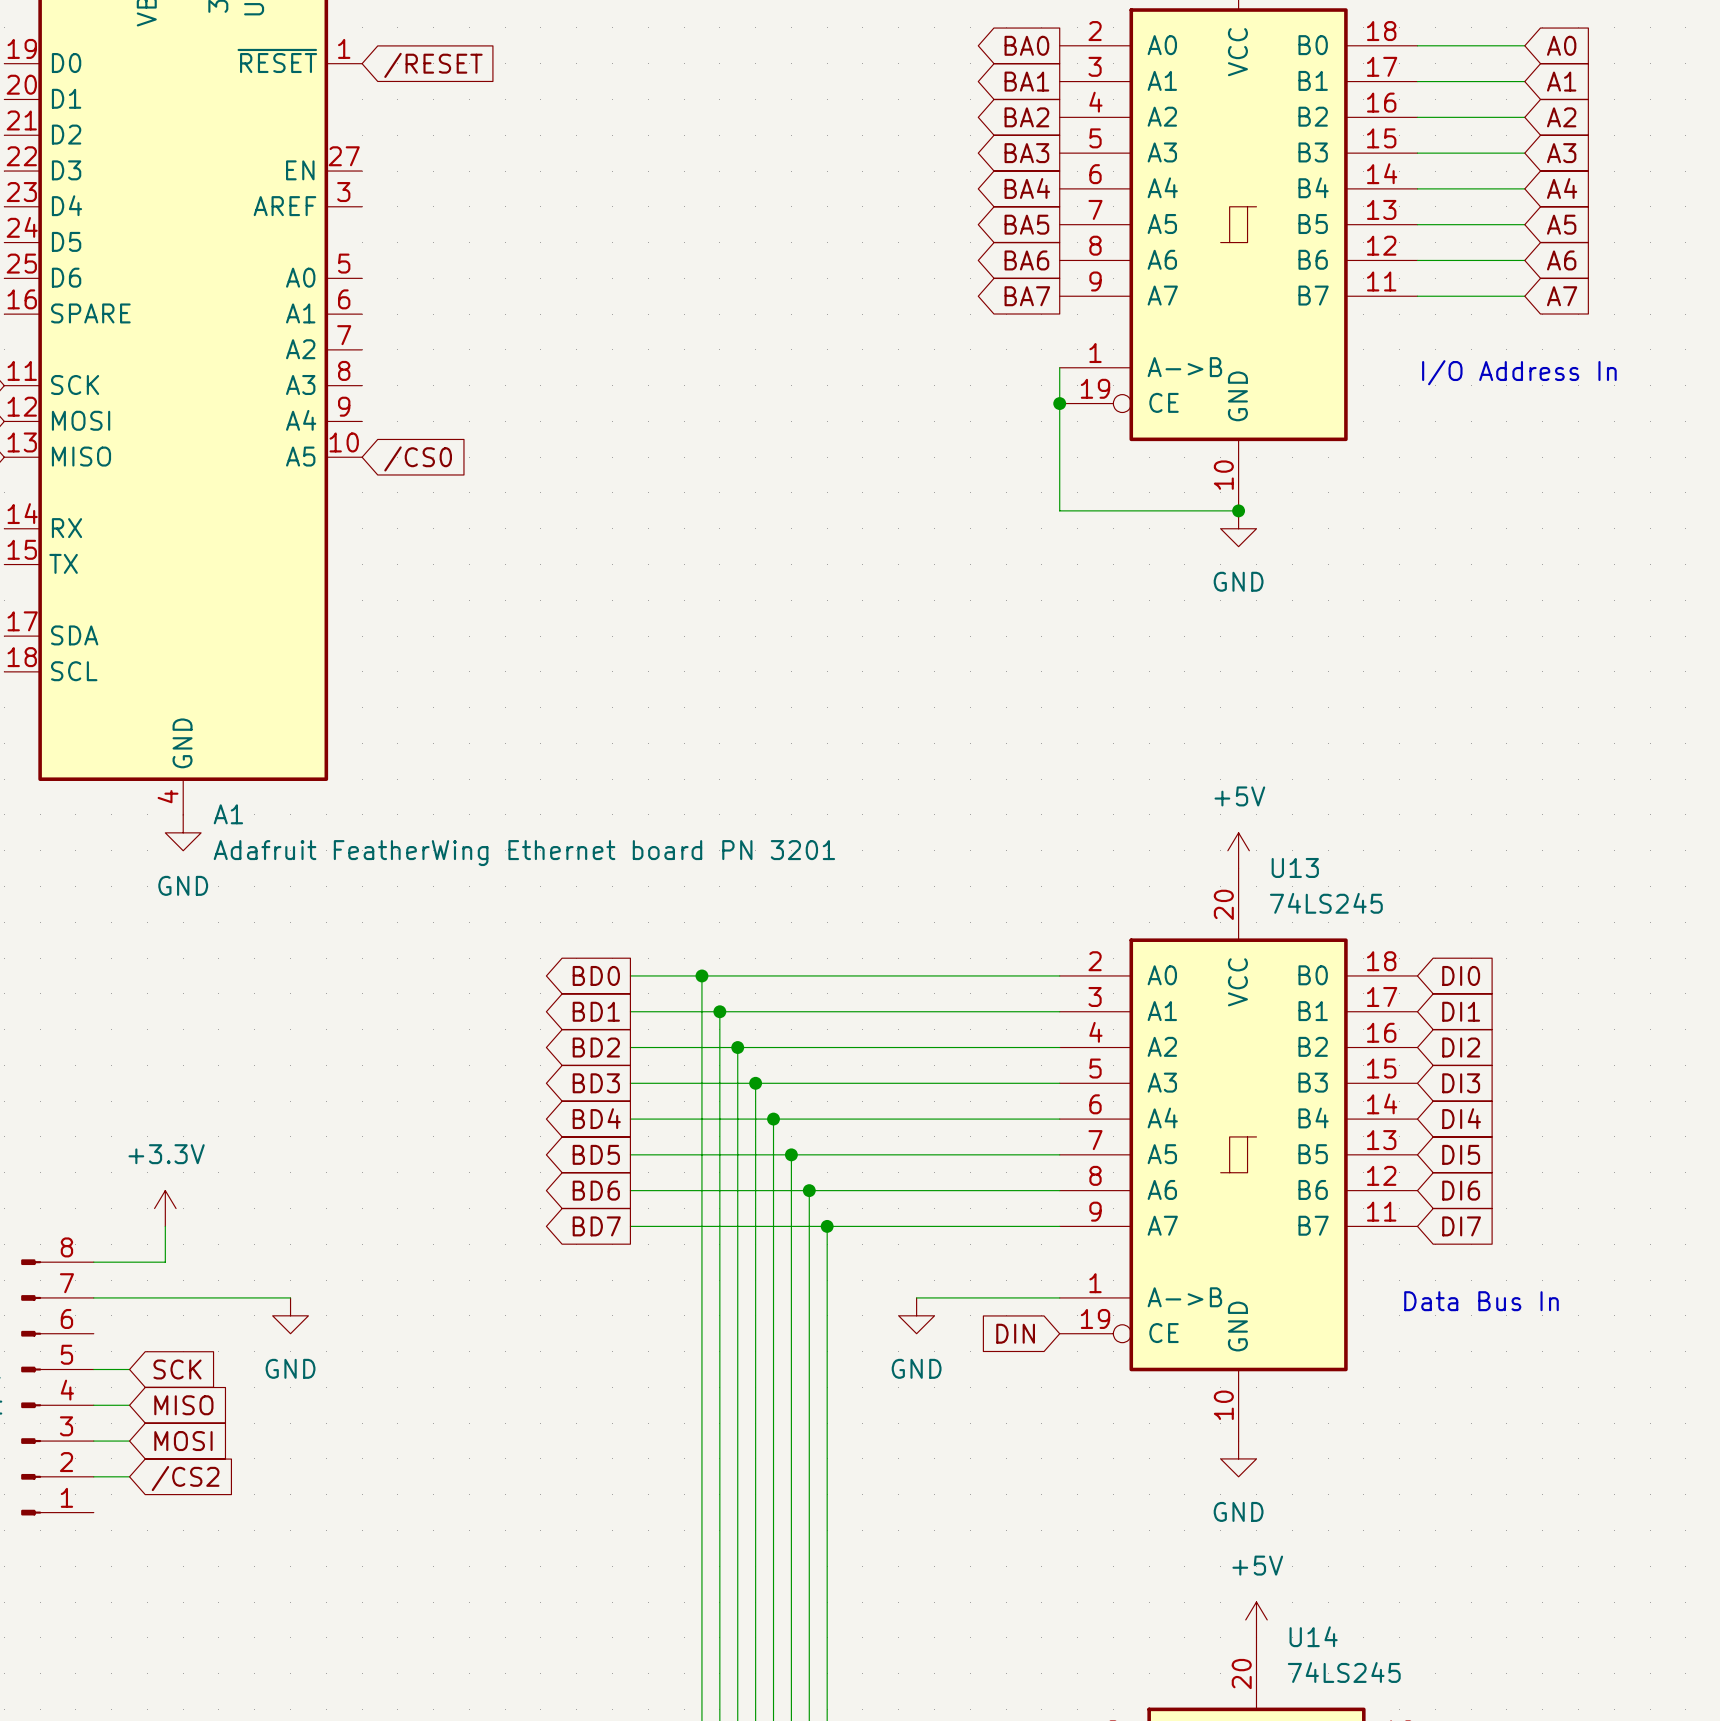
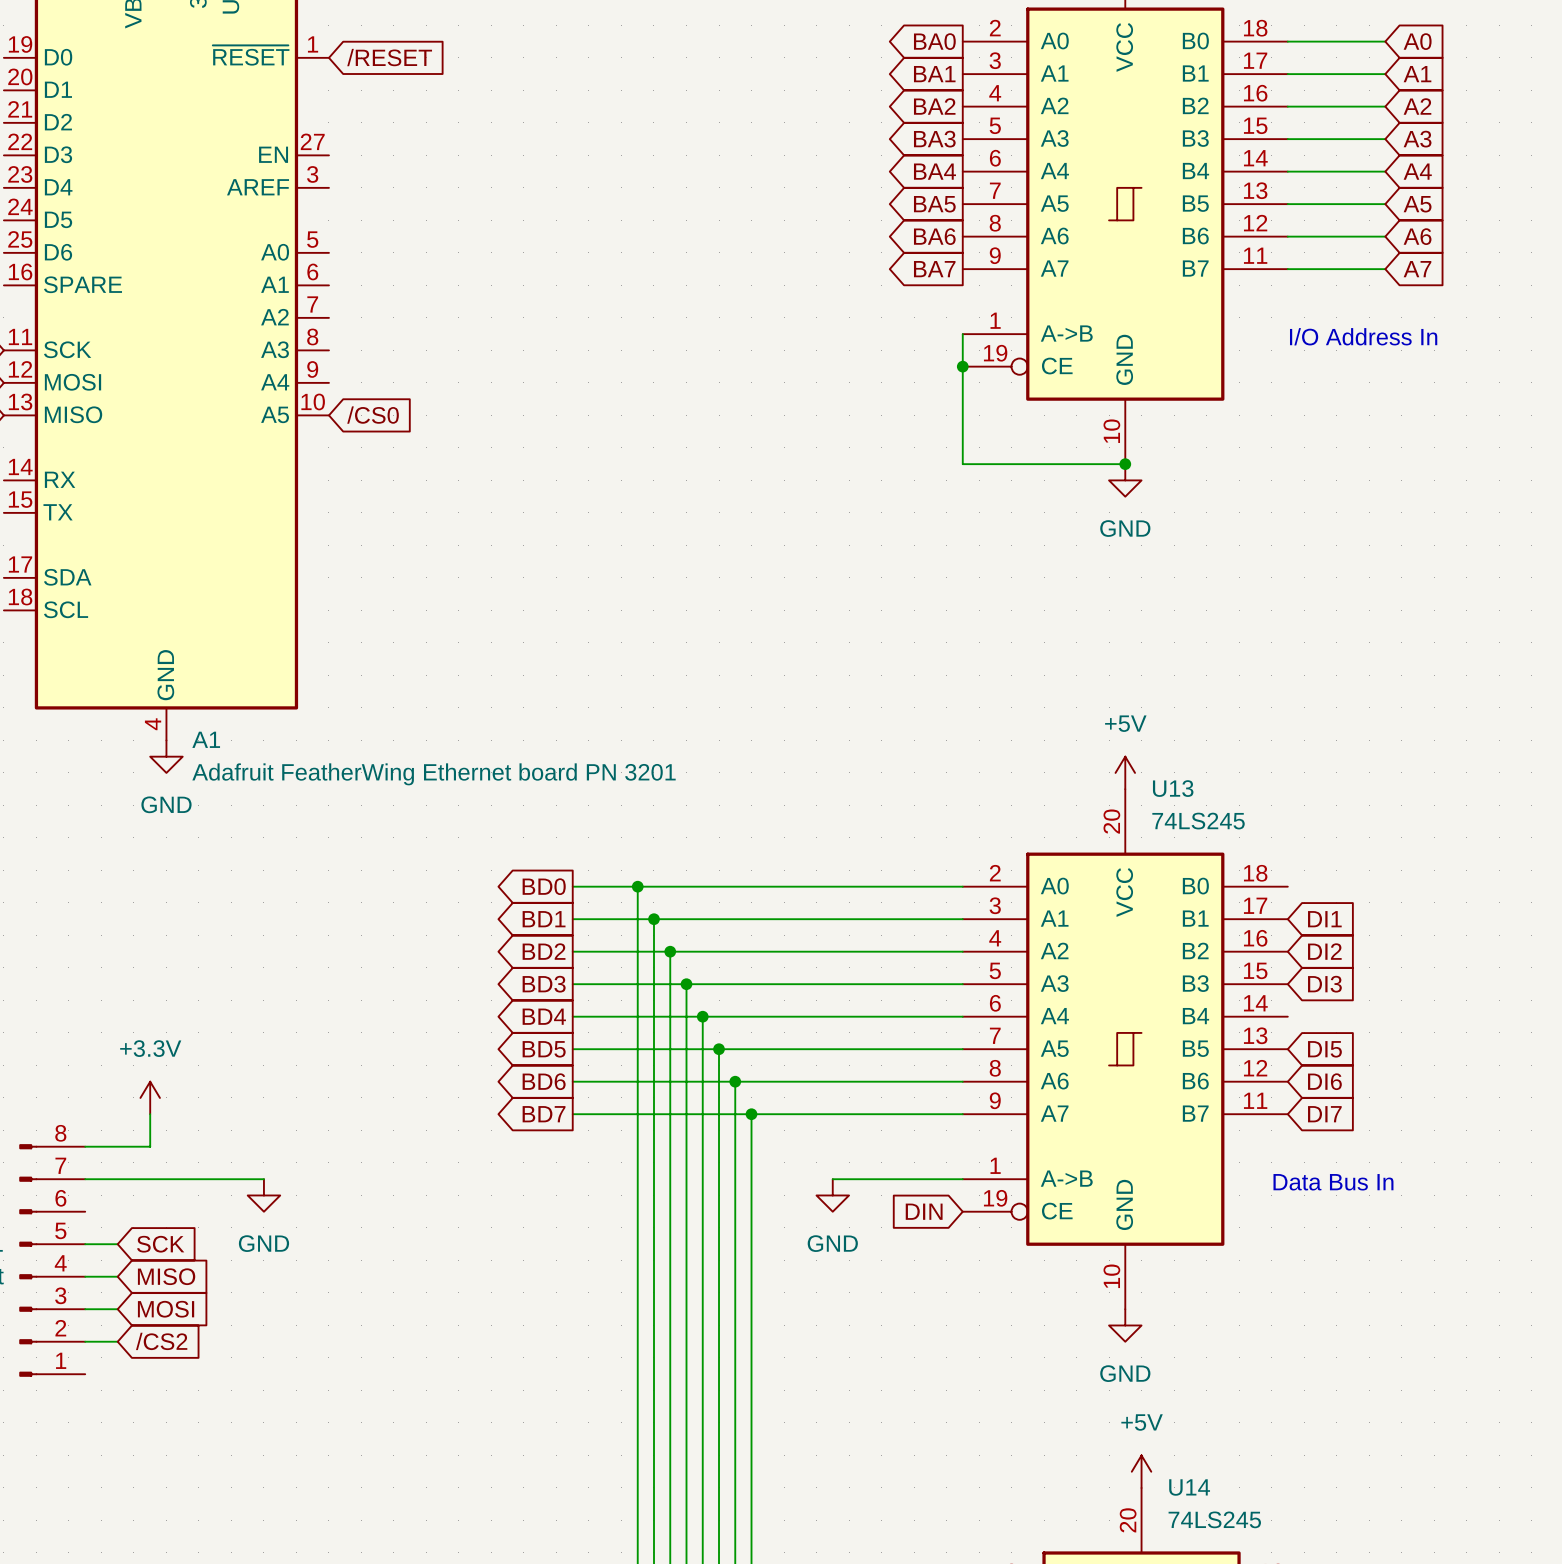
global label: DI0 (1461, 975) -> none
global label: DI4 (1461, 1118) -> none

